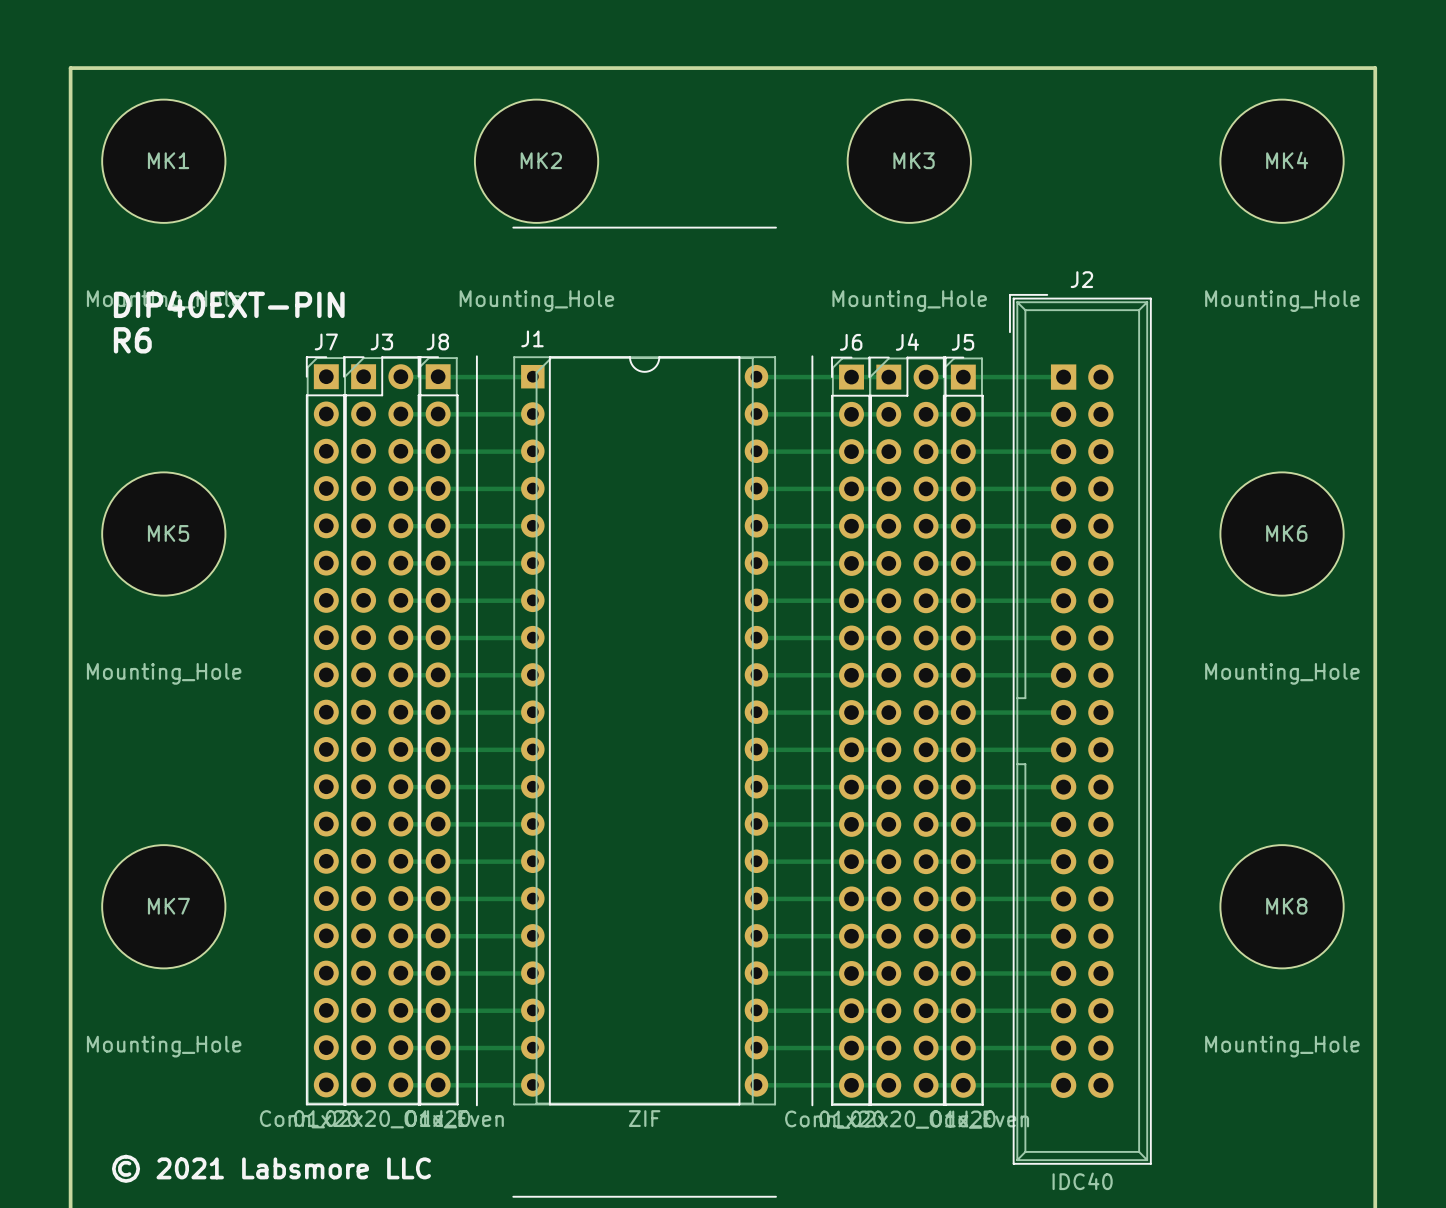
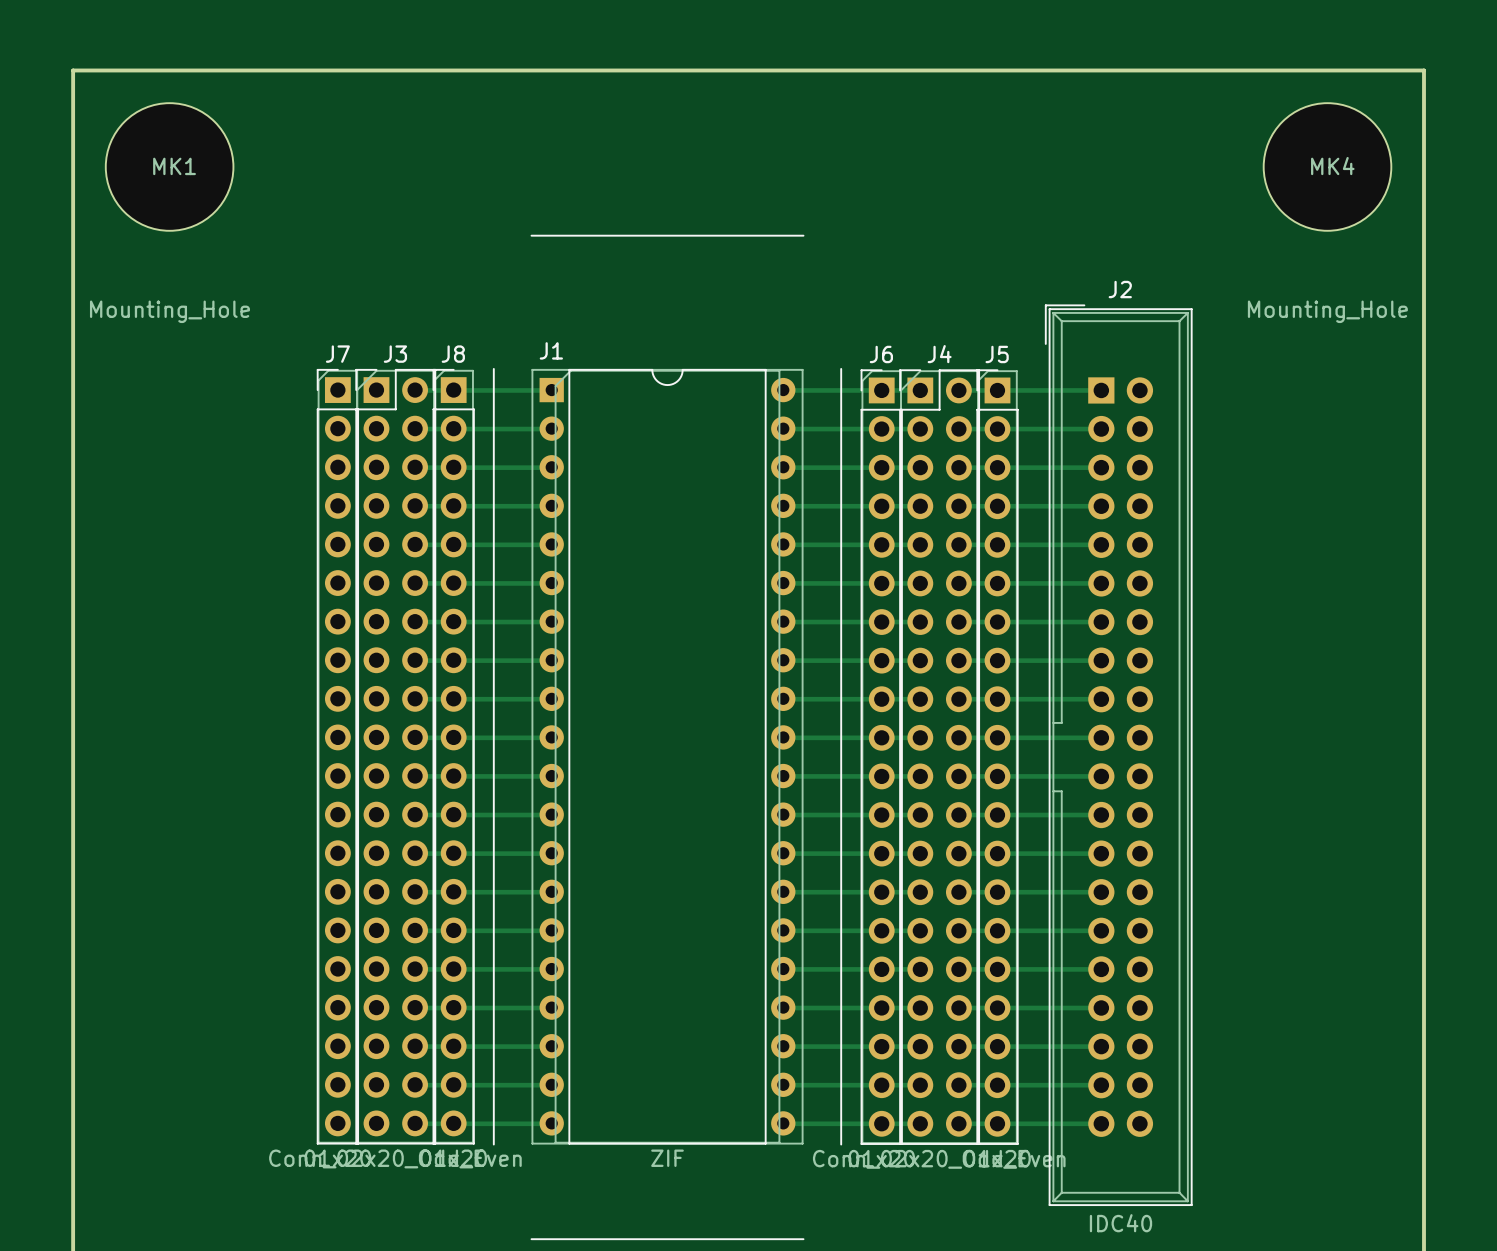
MK2: Mounting_Hole (536, 161) -> none
MK3: Mounting_Hole (909, 161) -> none
text: DIP40EXT-PIN (229, 304) -> none
text: R6 (132, 340) -> none
MK5: Mounting_Hole (163, 534) -> none
MK6: Mounting_Hole (1282, 534) -> none
MK7: Mounting_Hole (163, 906) -> none
MK8: Mounting_Hole (1282, 906) -> none
text: © 2021 Labsmore LLC (271, 1168) -> none

